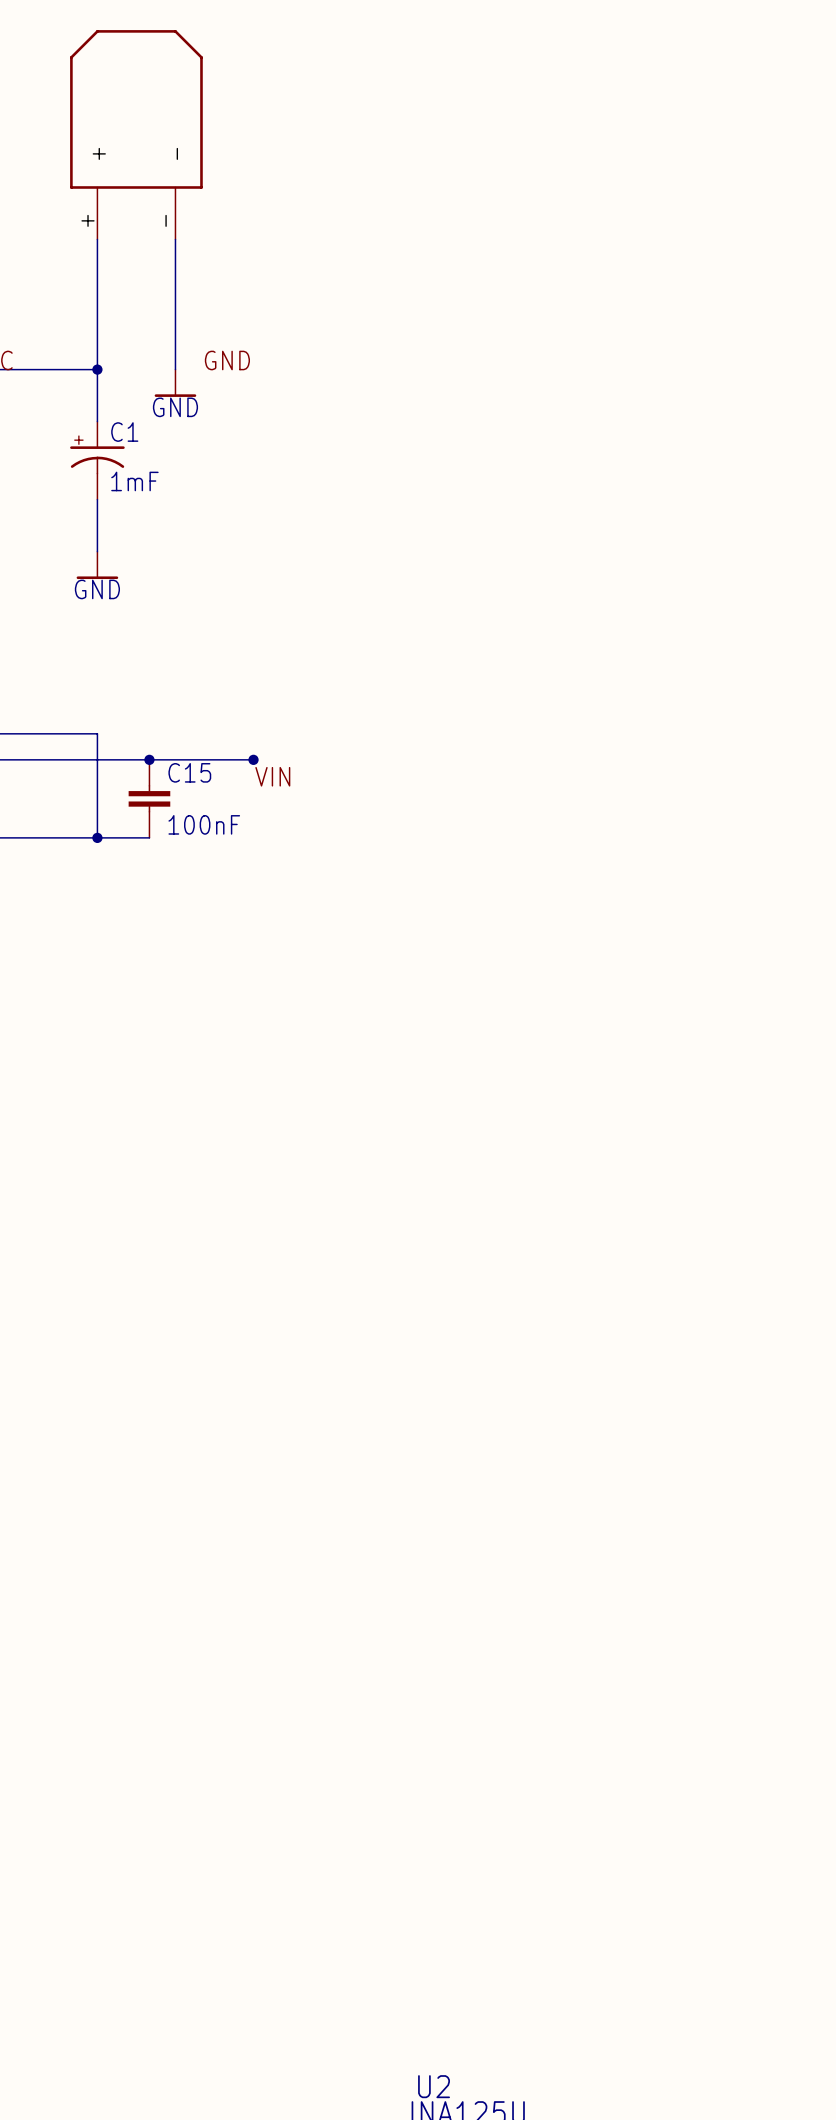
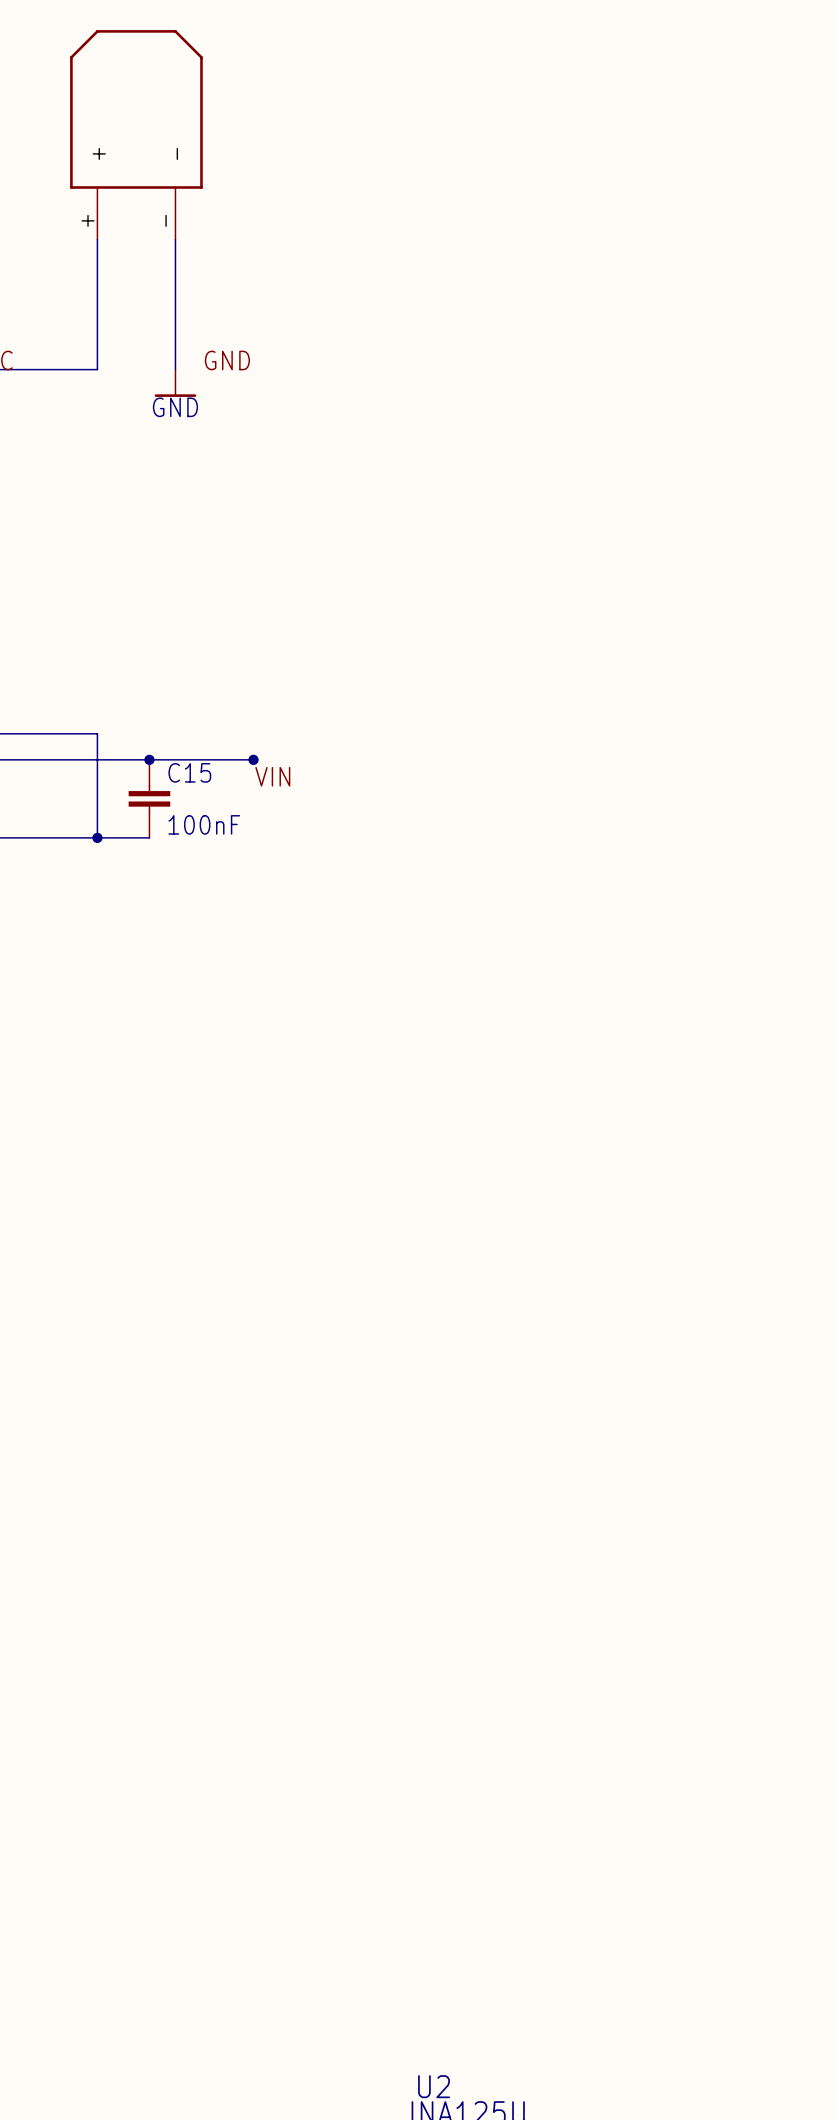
wire: (97, 369) (97, 421) -> none
junction: (97, 369) -> none
C1: 1mF (97, 460) -> none
wire: (97, 499) (97, 551) -> none
power symbol: GND (97, 565) -> none

